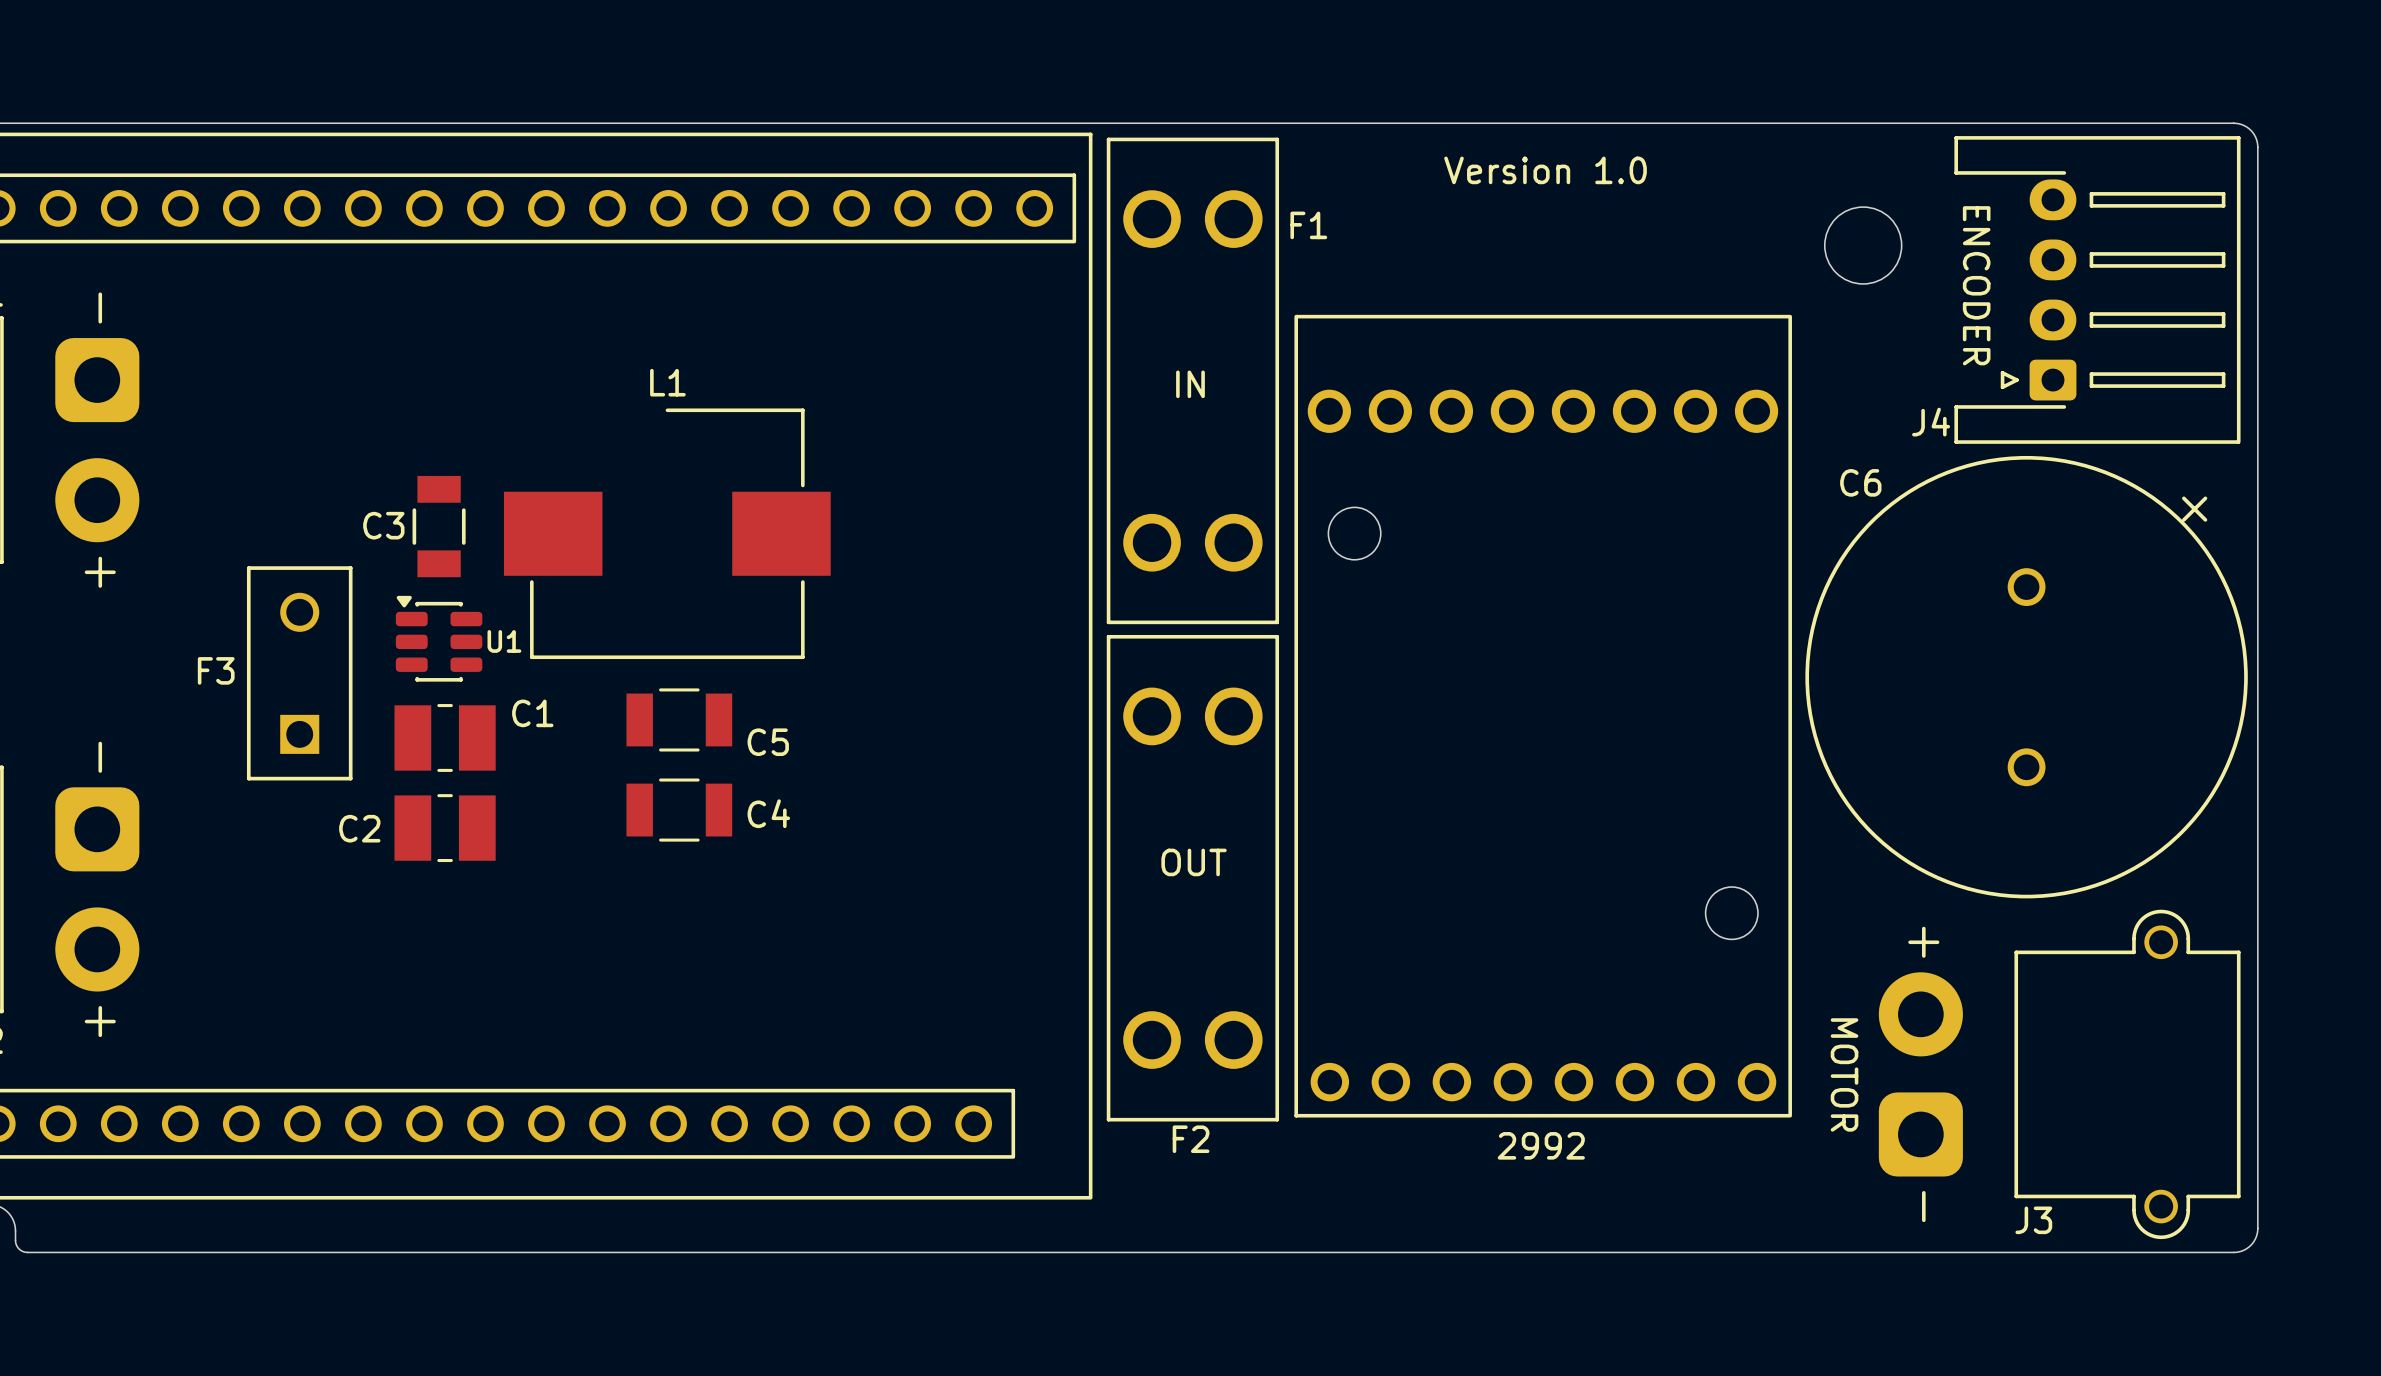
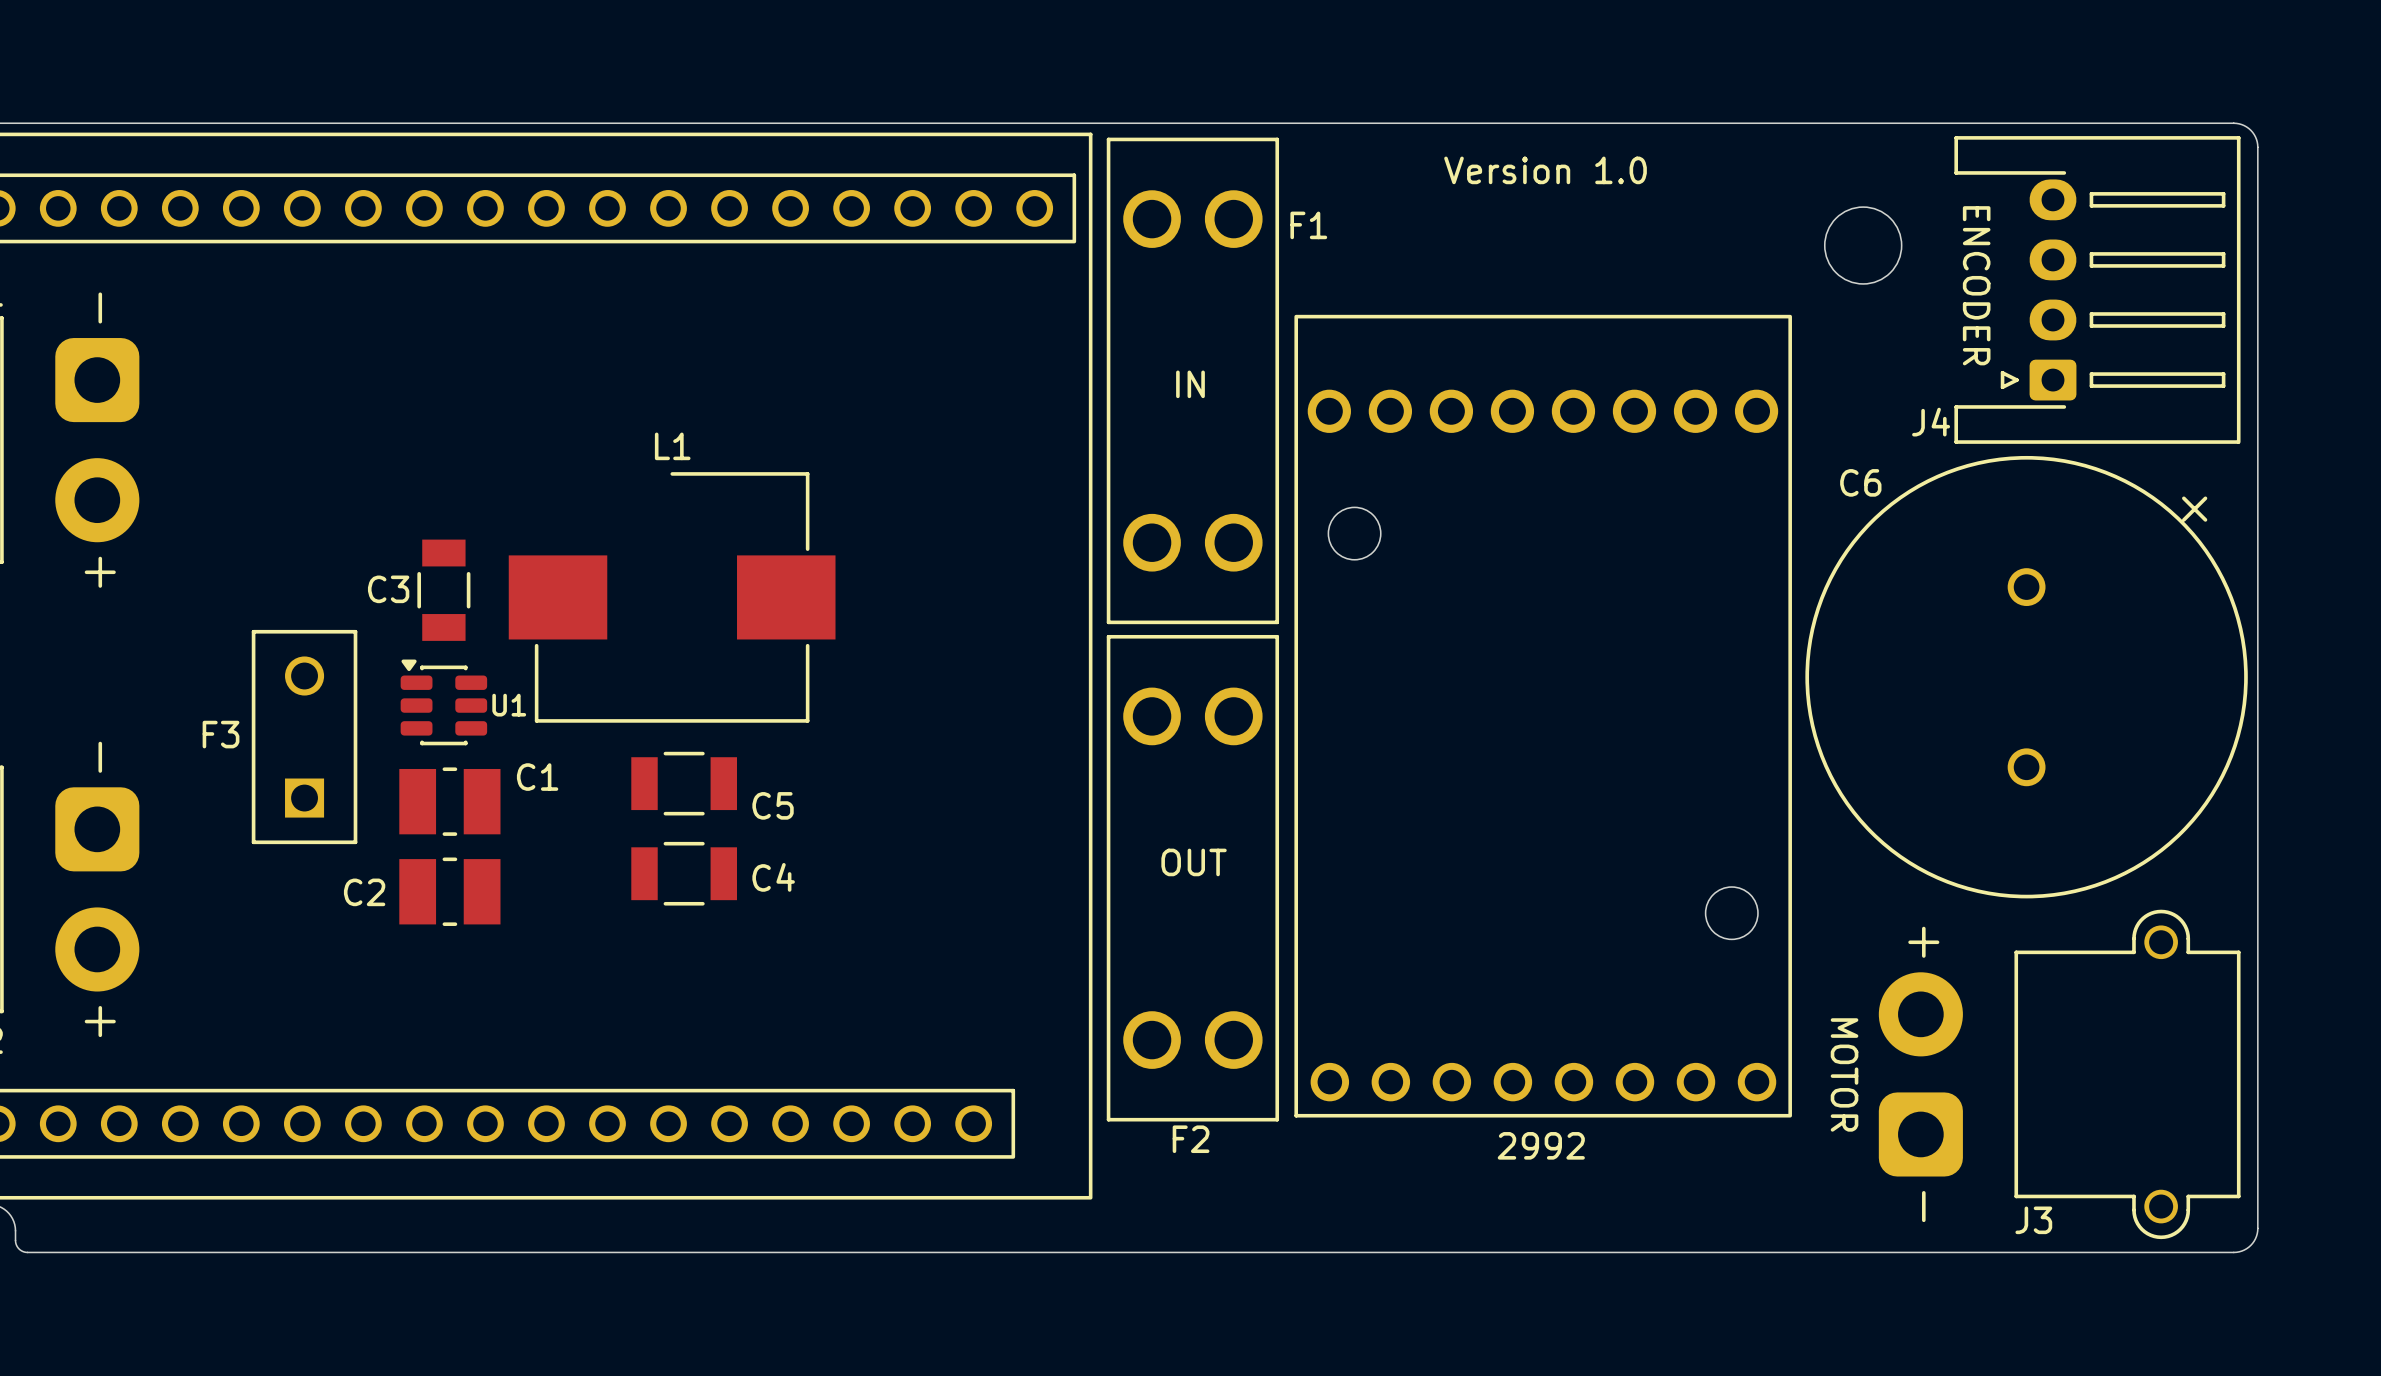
C3 position: (439, 526) -> (443, 590)
L1 position: (667, 533) -> (672, 597)
U1 position: (439, 638) -> (443, 702)
F3 position: (299, 673) -> (304, 737)
C5 footprint: [626, 688, 733, 752] -> [631, 751, 738, 816]
C1 footprint: [394, 704, 496, 772] -> [399, 767, 501, 836]
C4 footprint: [626, 778, 733, 842] -> [631, 841, 738, 906]
C2 footprint: [394, 794, 496, 863] -> [399, 857, 501, 926]

